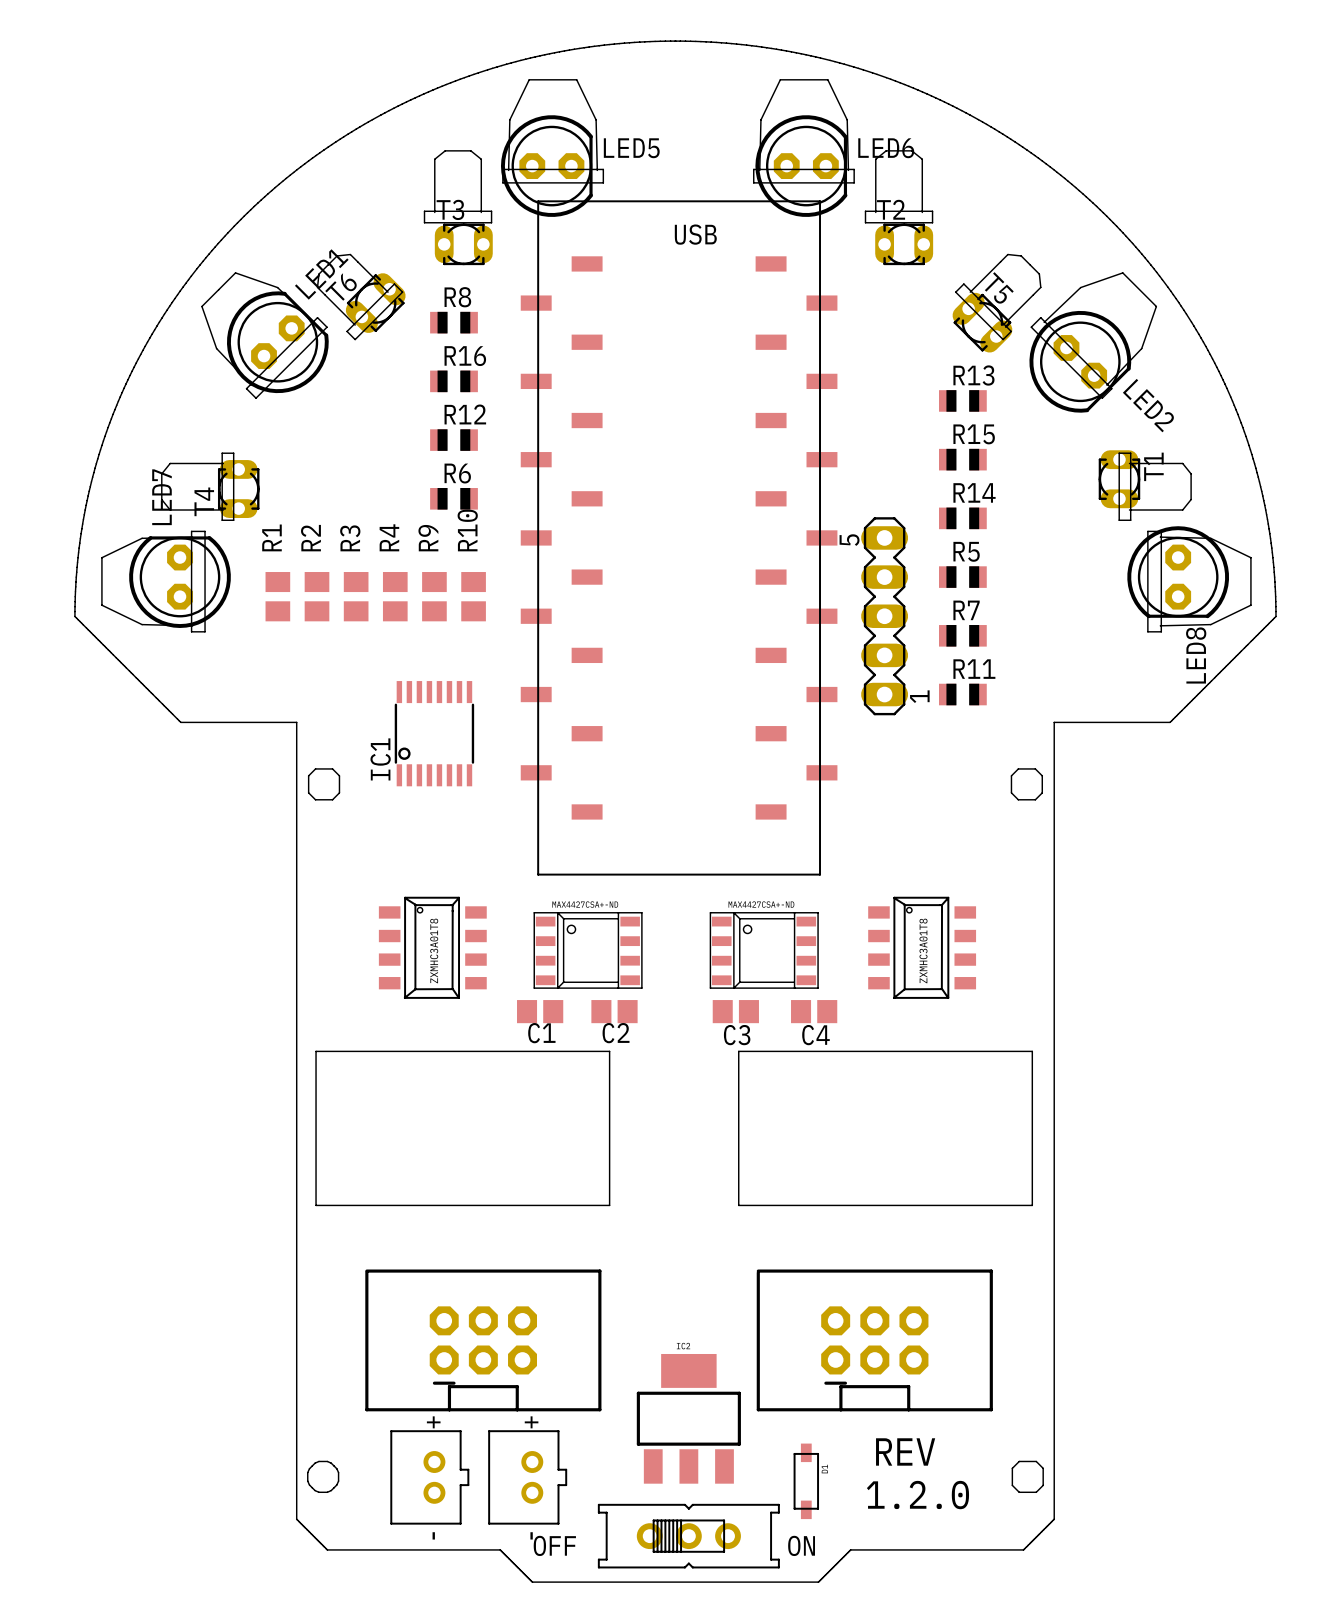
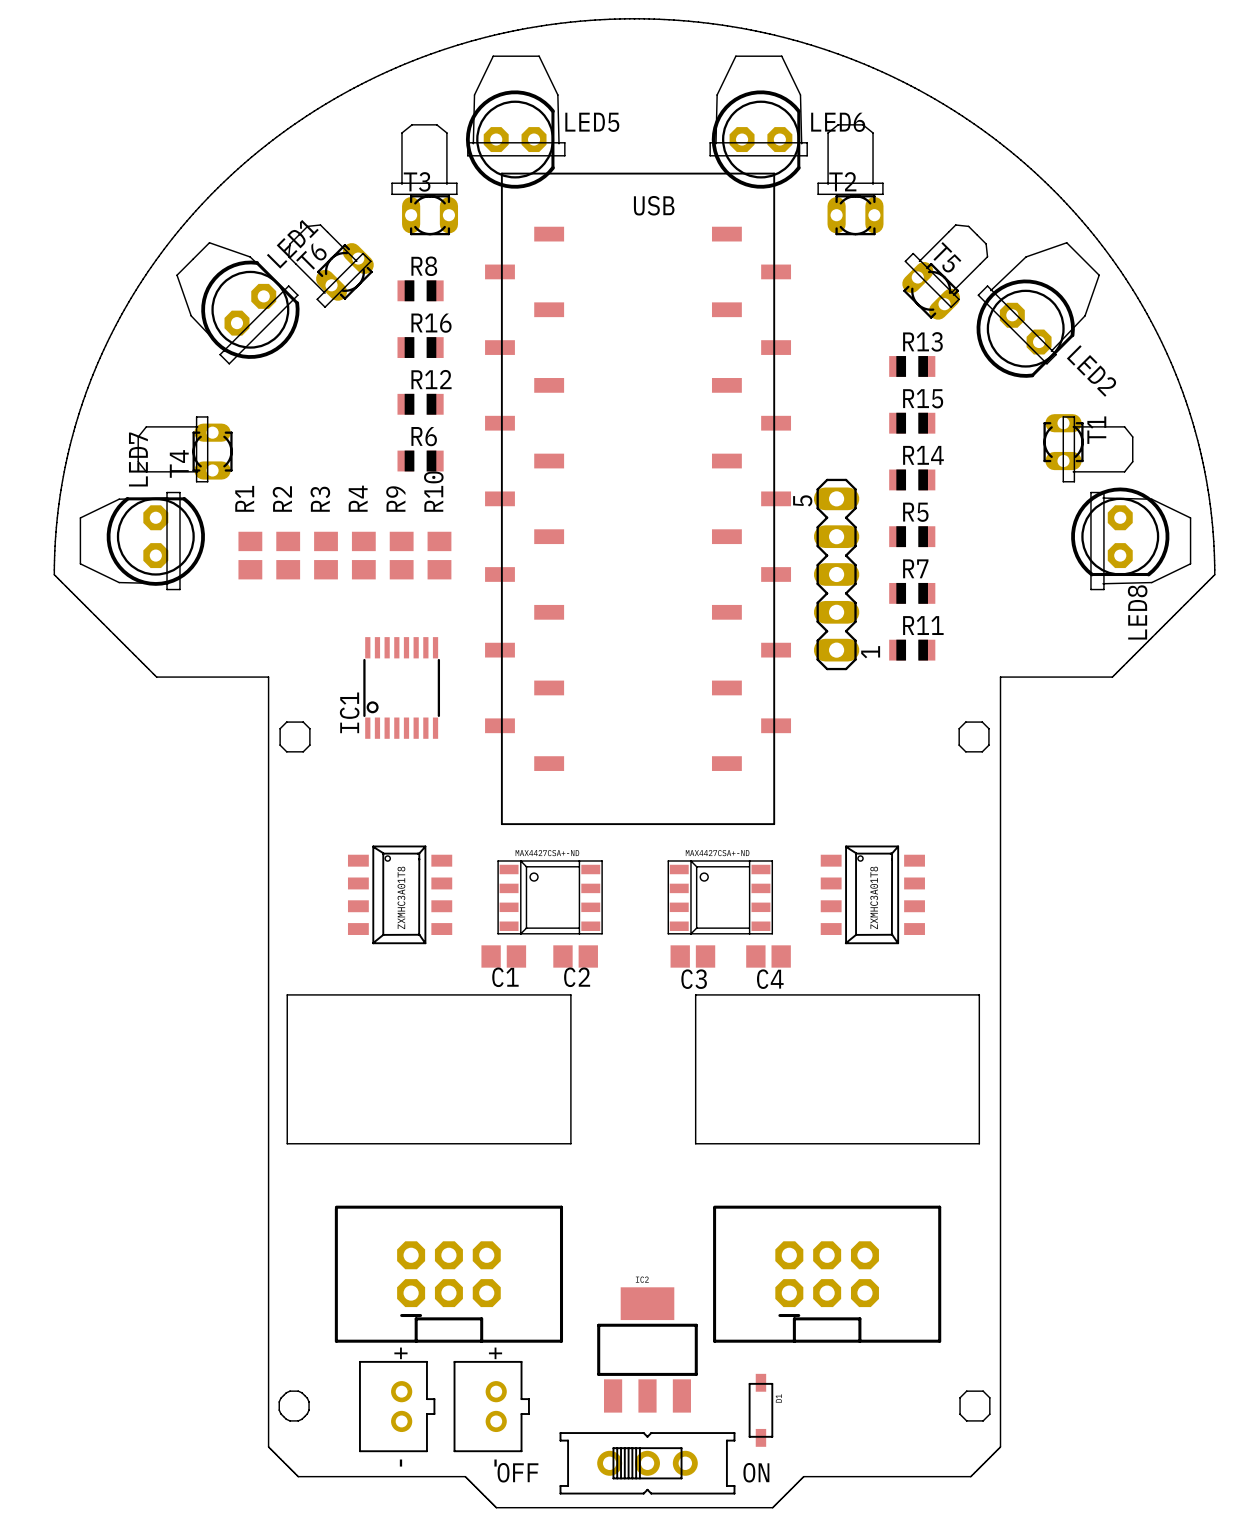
text: REV (905, 1451) -> none
text: 1.2.0 (917, 1495) -> none

